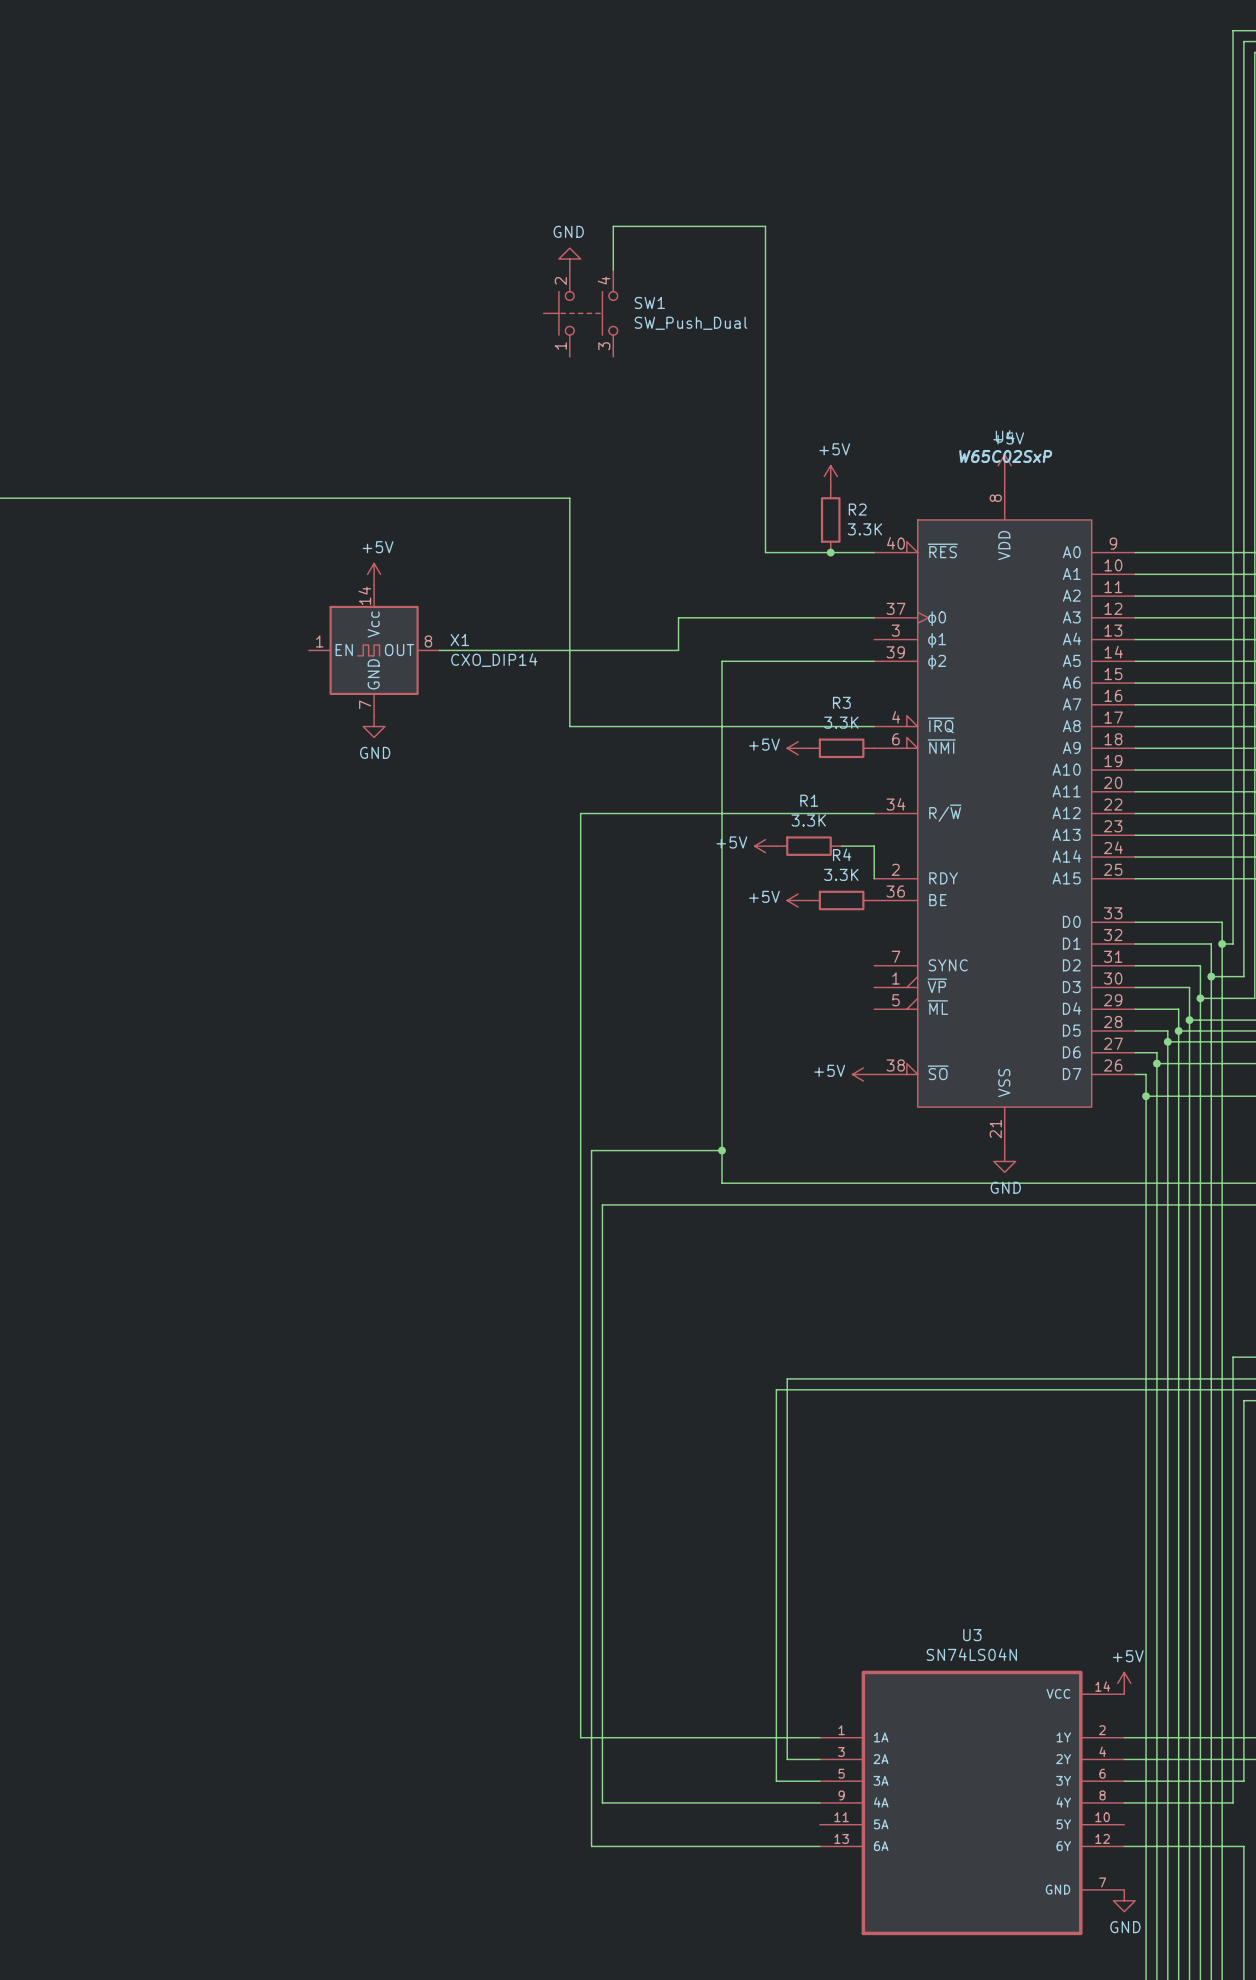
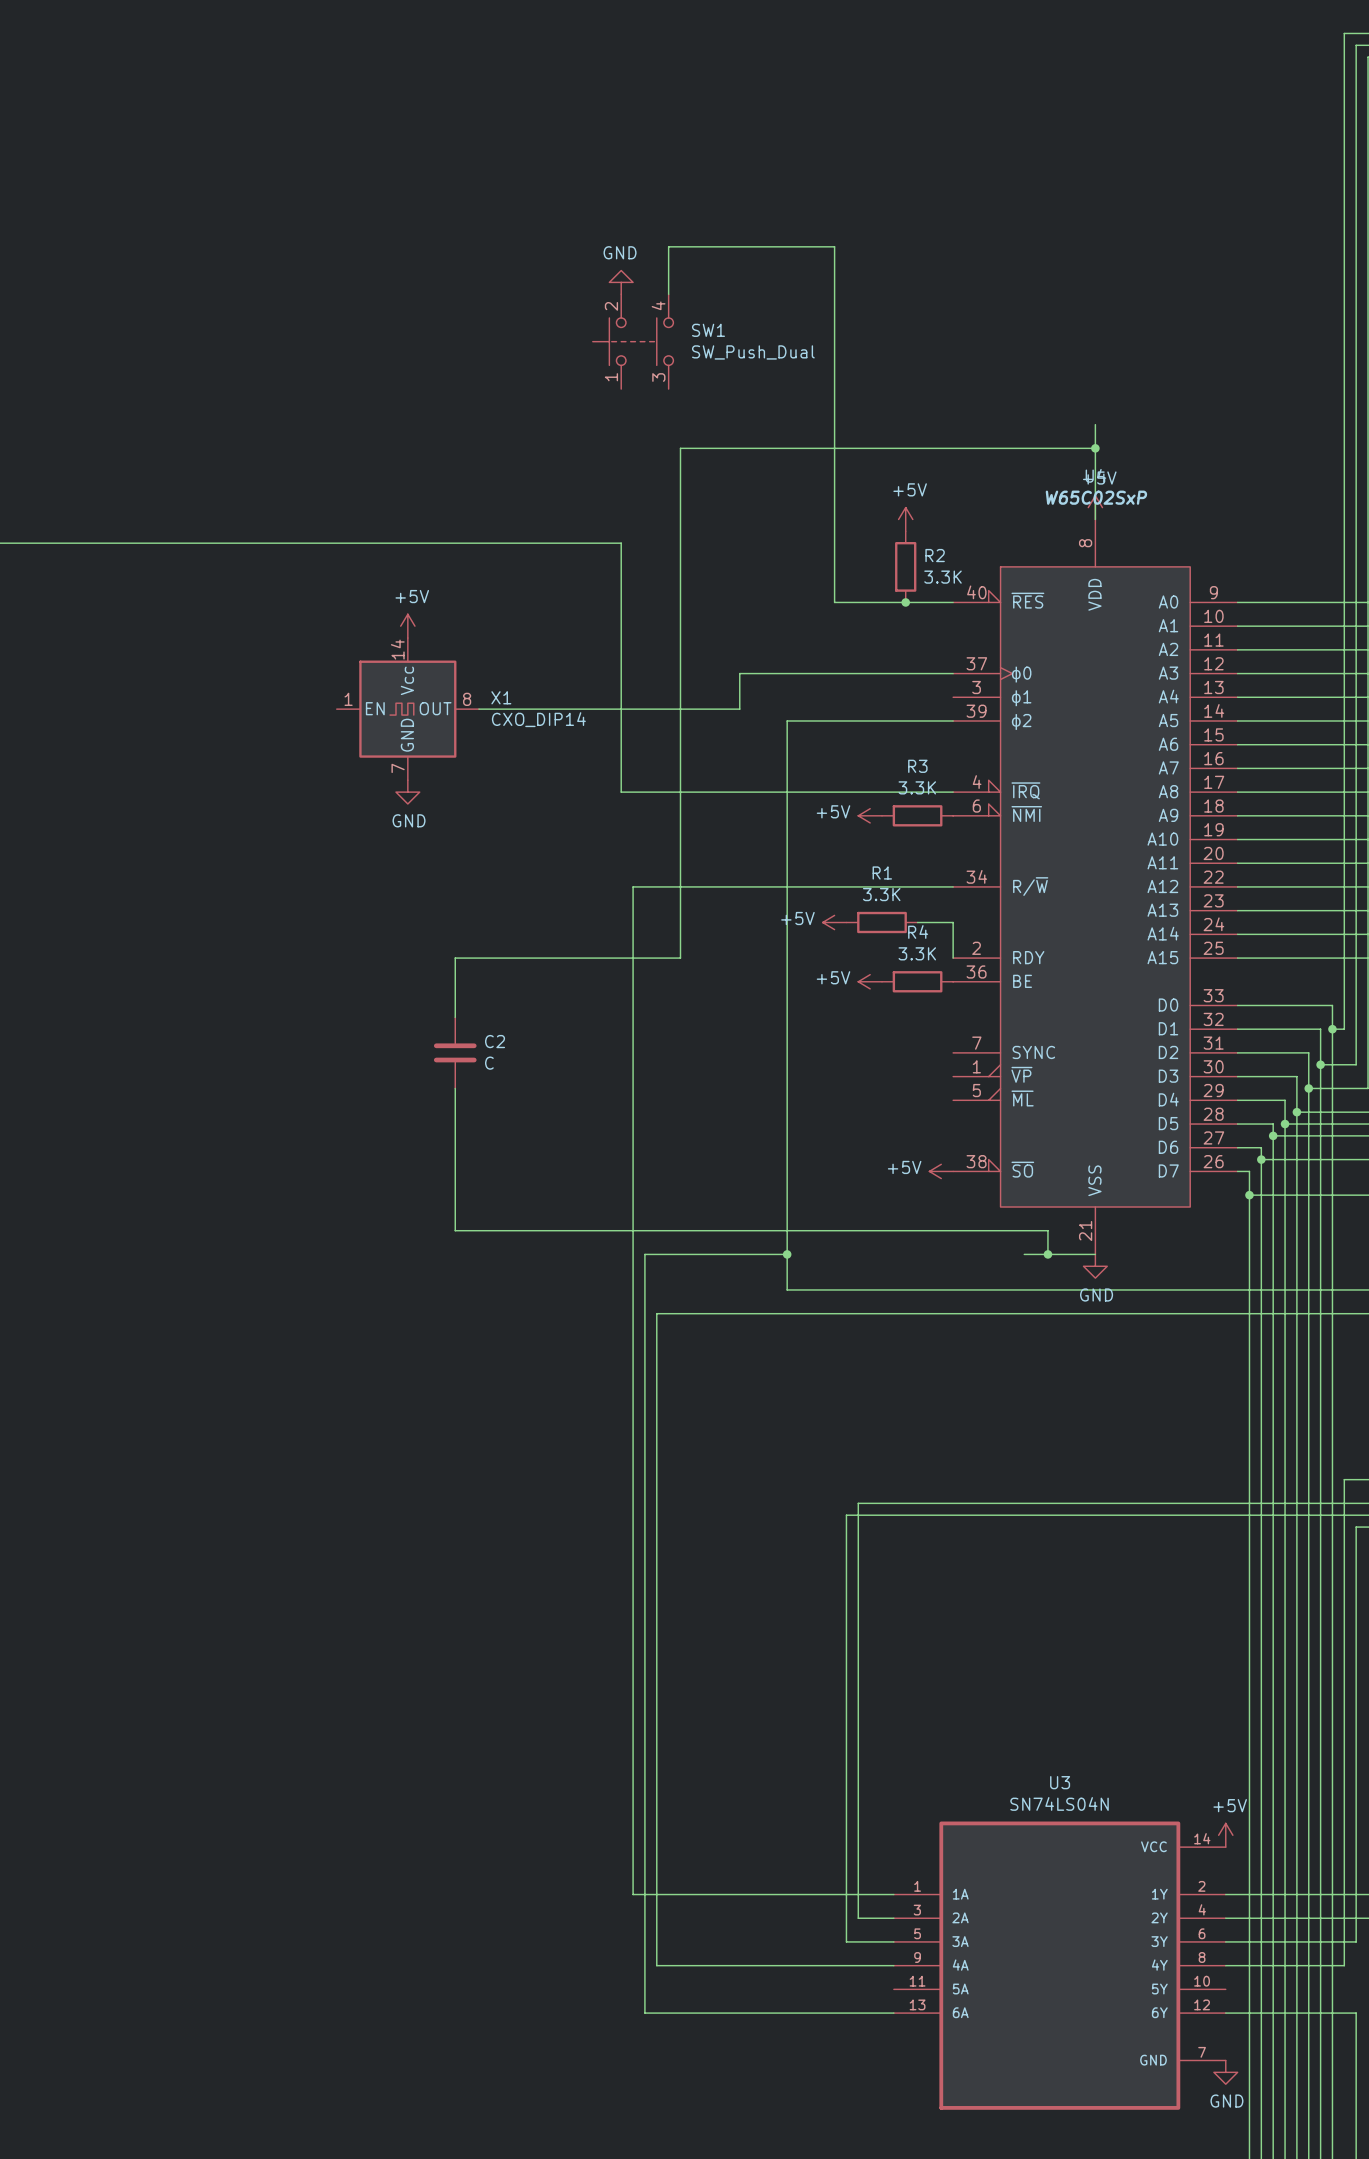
wire: none -> (1095, 424) (1095, 519)
wire: none -> (1095, 448) (680, 448) (680, 958) (455, 958) (455, 1017)
junction: none -> (1095, 448)
C2: none -> C (455, 1052)
wire: none -> (455, 1088) (455, 1230) (1047, 1230) (1047, 1254)
wire: none -> (1024, 1254) (1095, 1254)
junction: none -> (1047, 1254)

